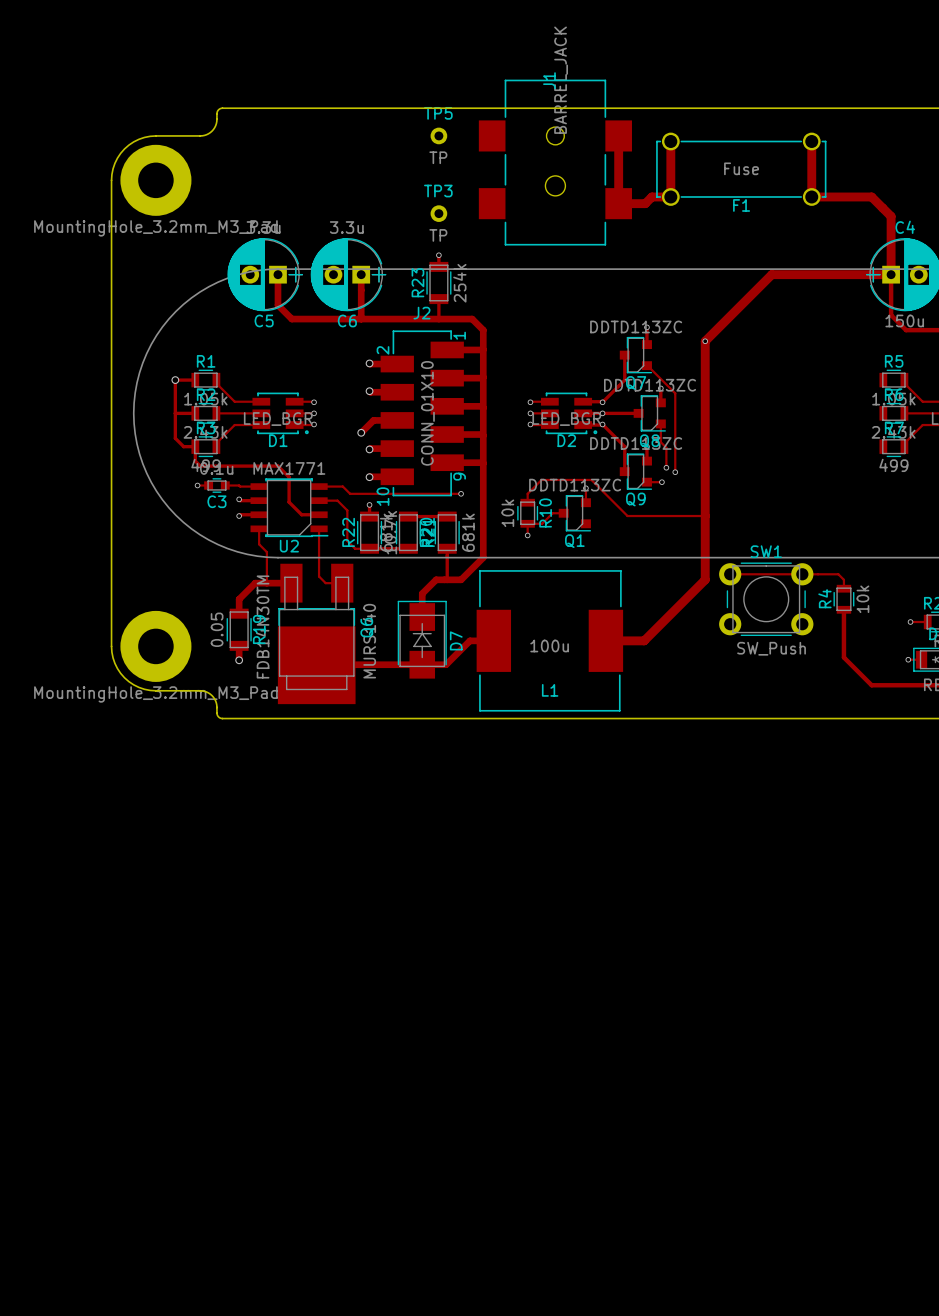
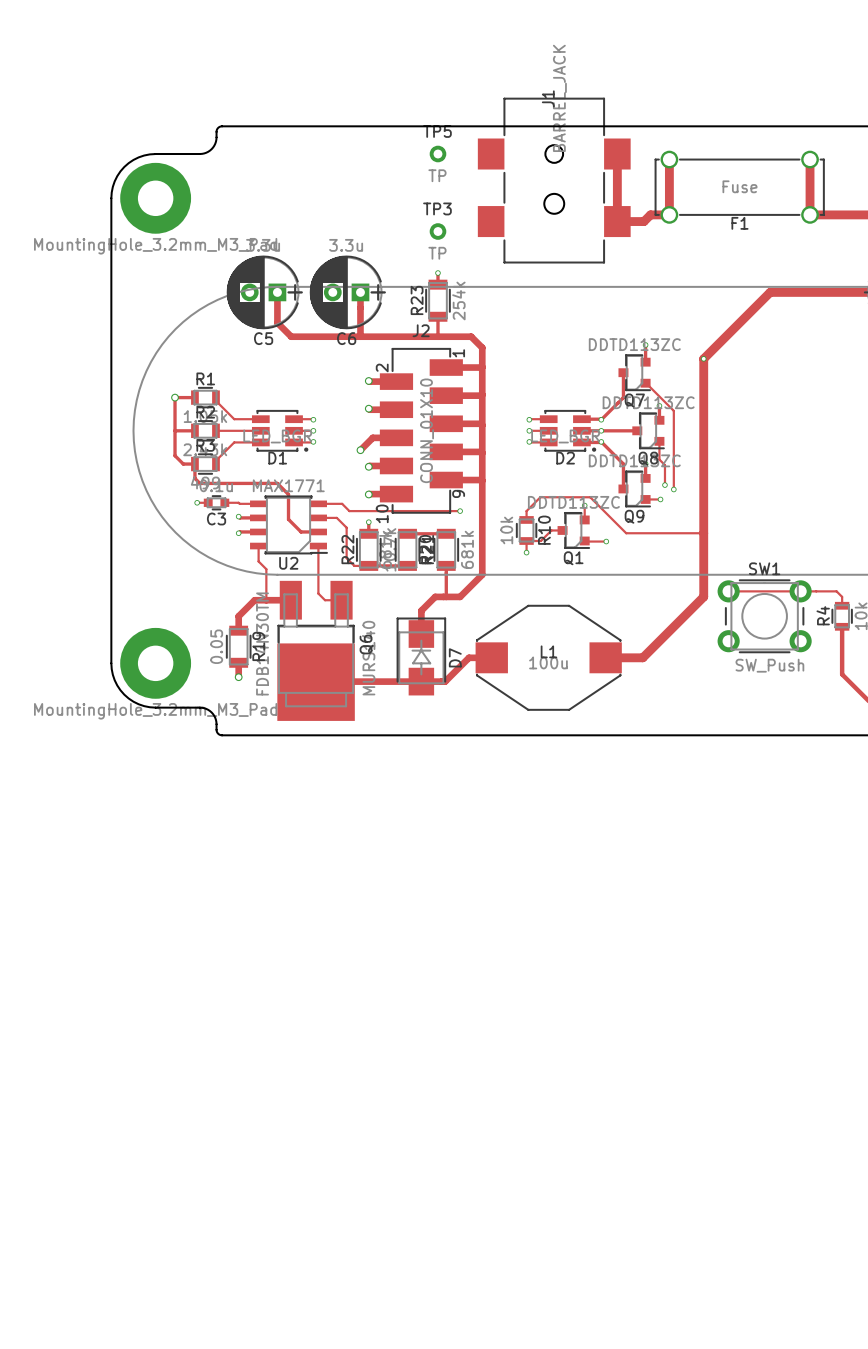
track: none -> (584, 540) (606, 541)
via: none -> (606, 541)
L1 footprint: [476, 570, 624, 712] -> [475, 604, 622, 711]
L1 name position: L1 (550, 690) -> L1 (548, 651)

